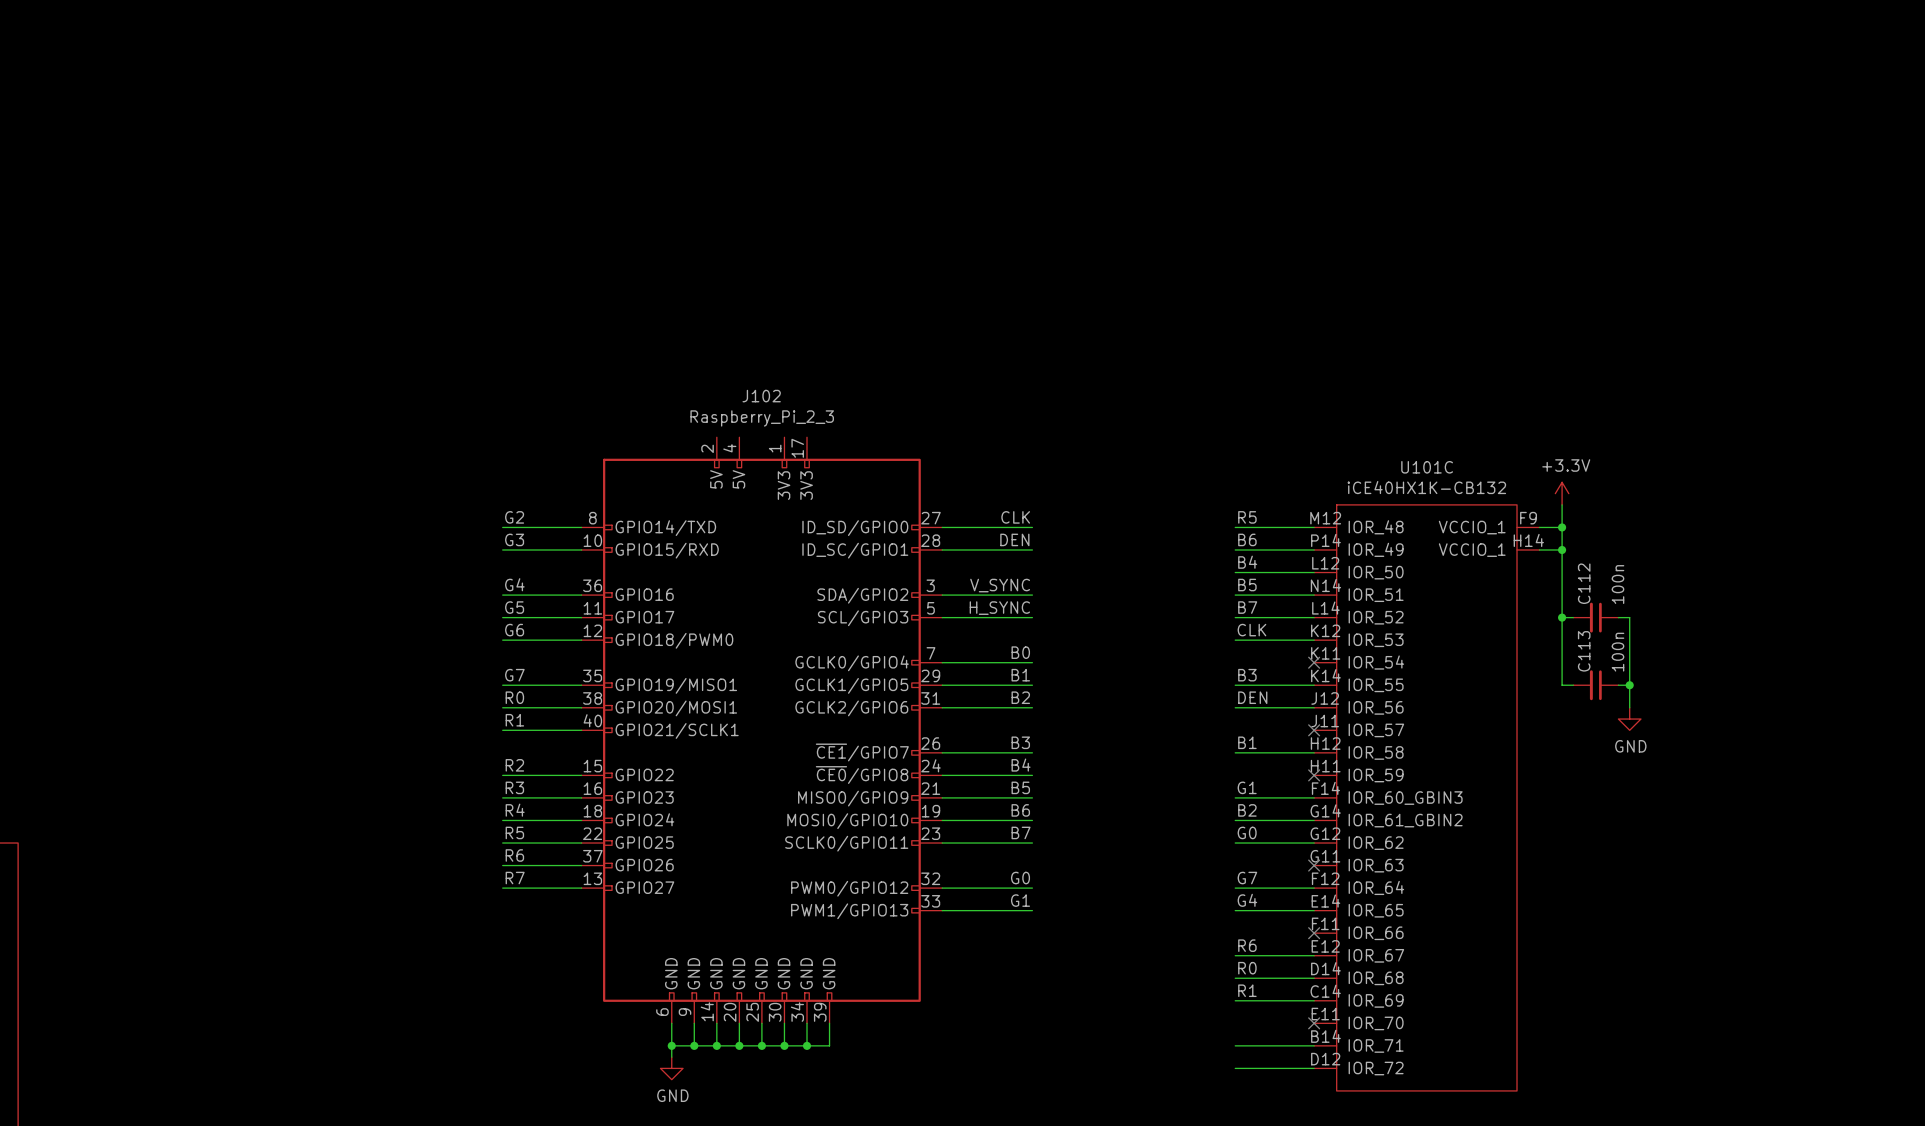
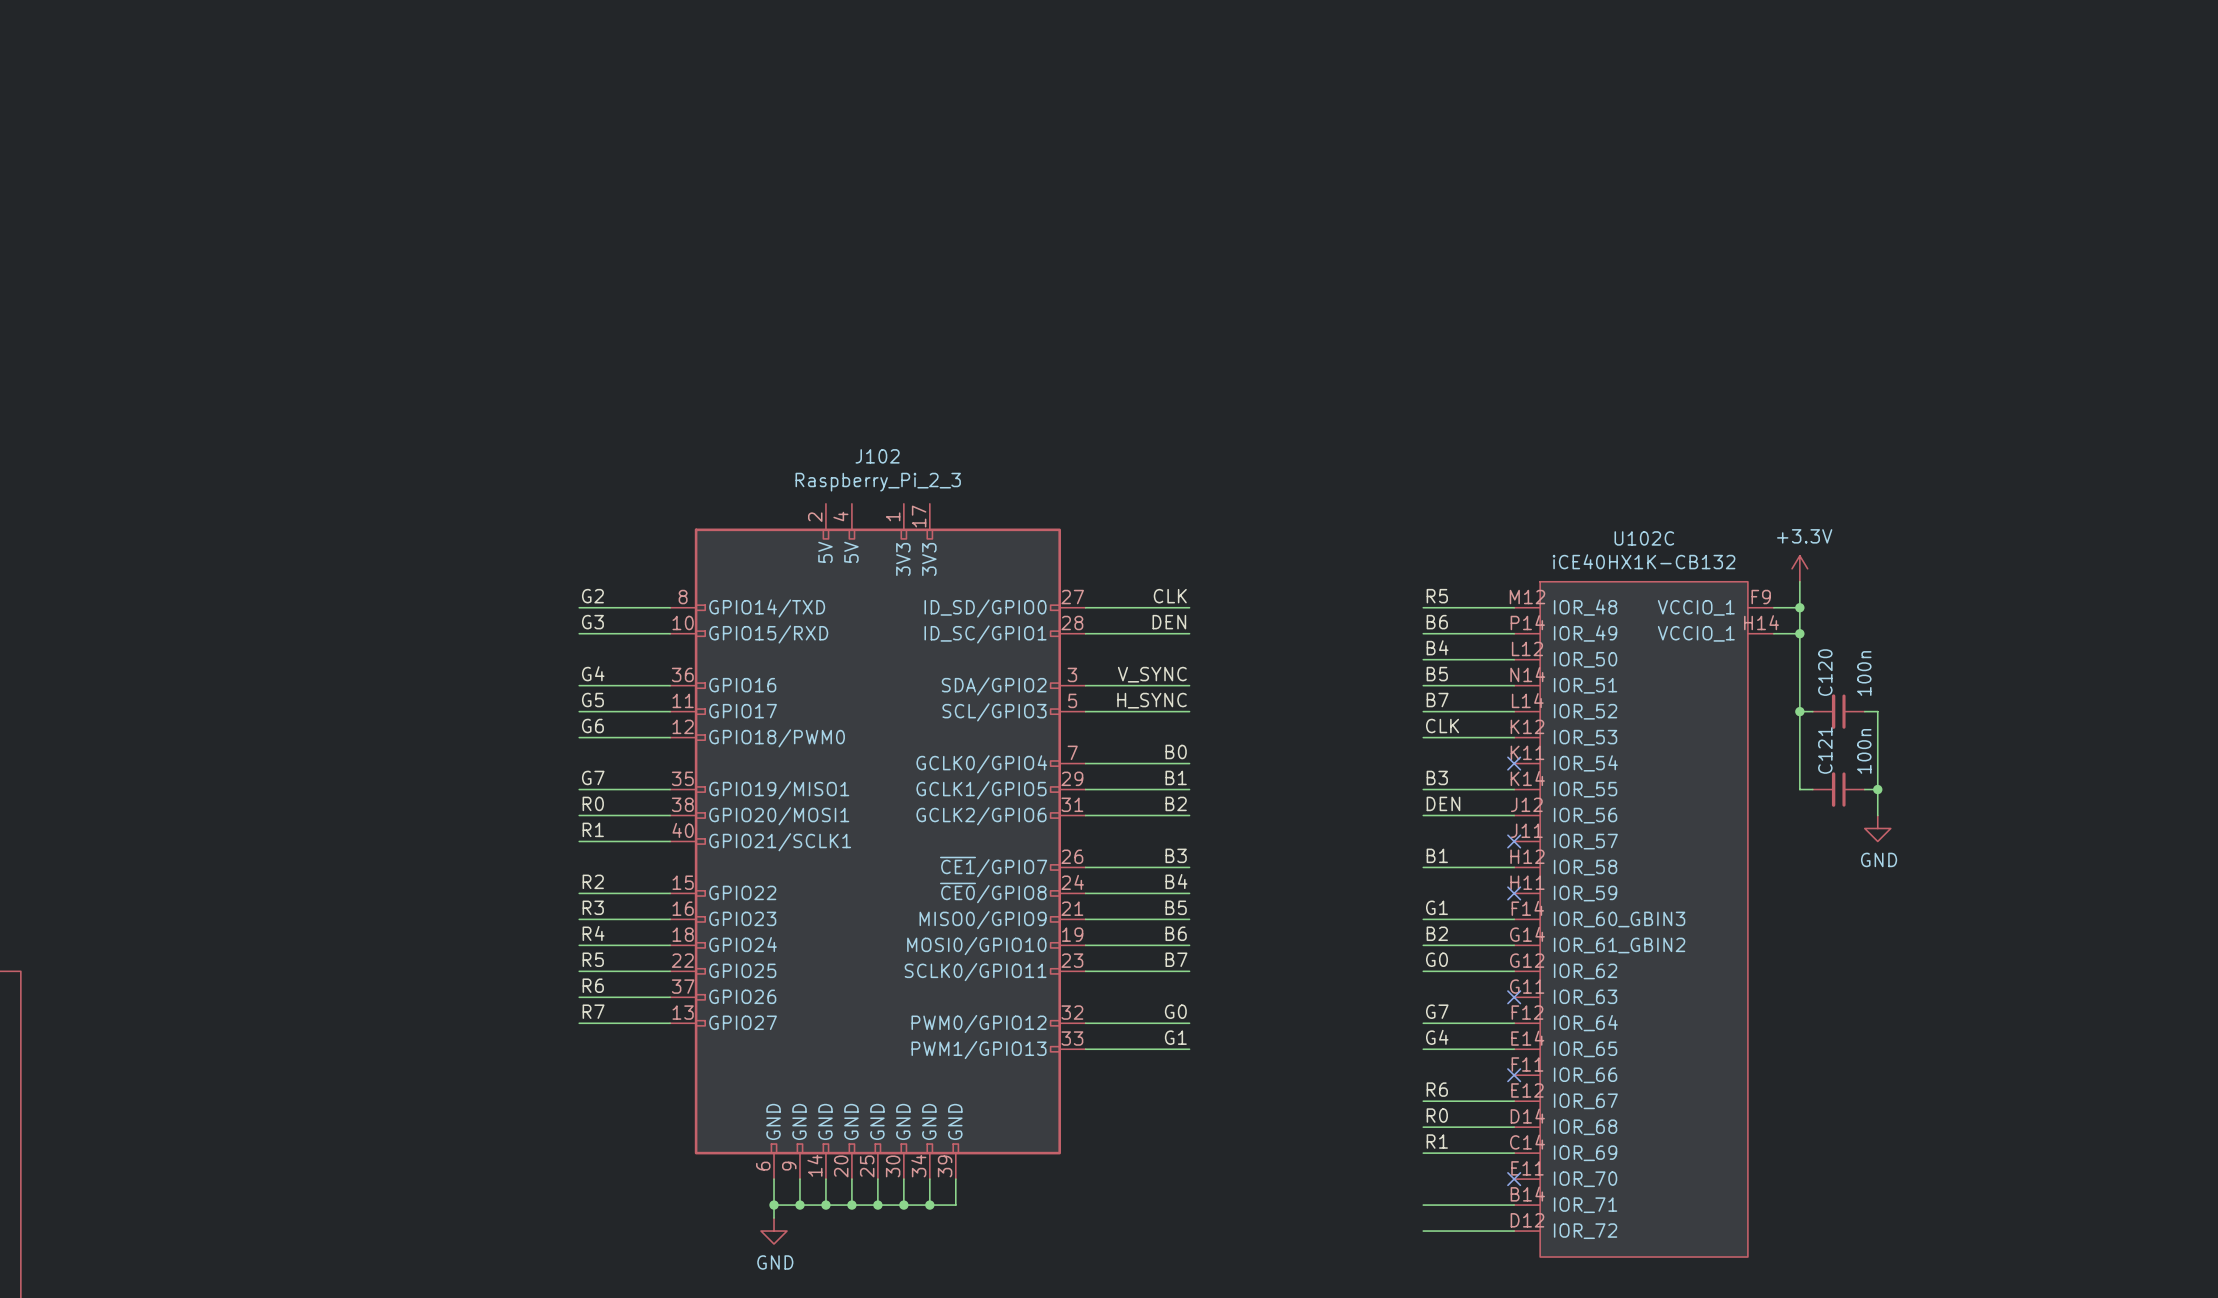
U101C name: U101C (1427, 467) -> U102C (1644, 538)
C112 name: C112 (1584, 583) -> C120 (1825, 672)
C113 name: C113 (1584, 651) -> C121 (1825, 750)

